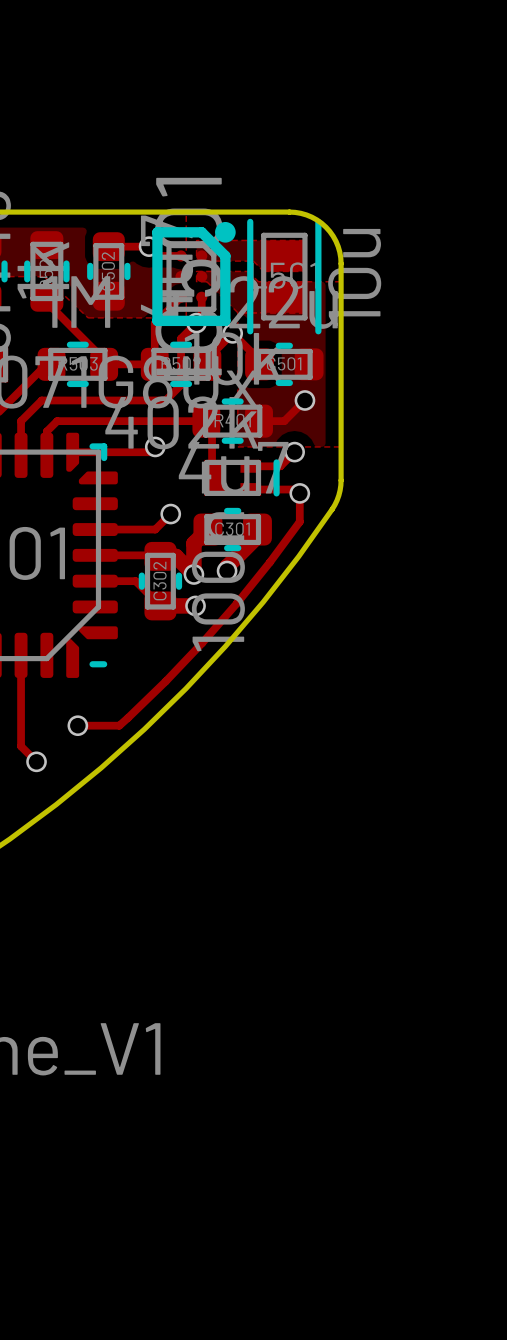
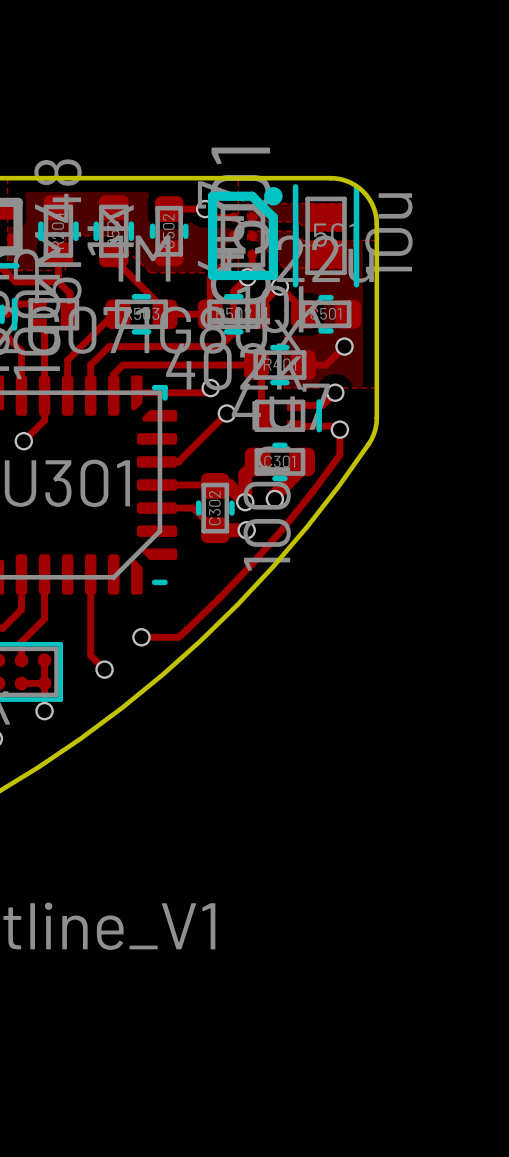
track: (170, 514) (155, 529) (119, 529) -> (226, 413) (178, 461)
via position: (170, 514) -> (226, 413)

